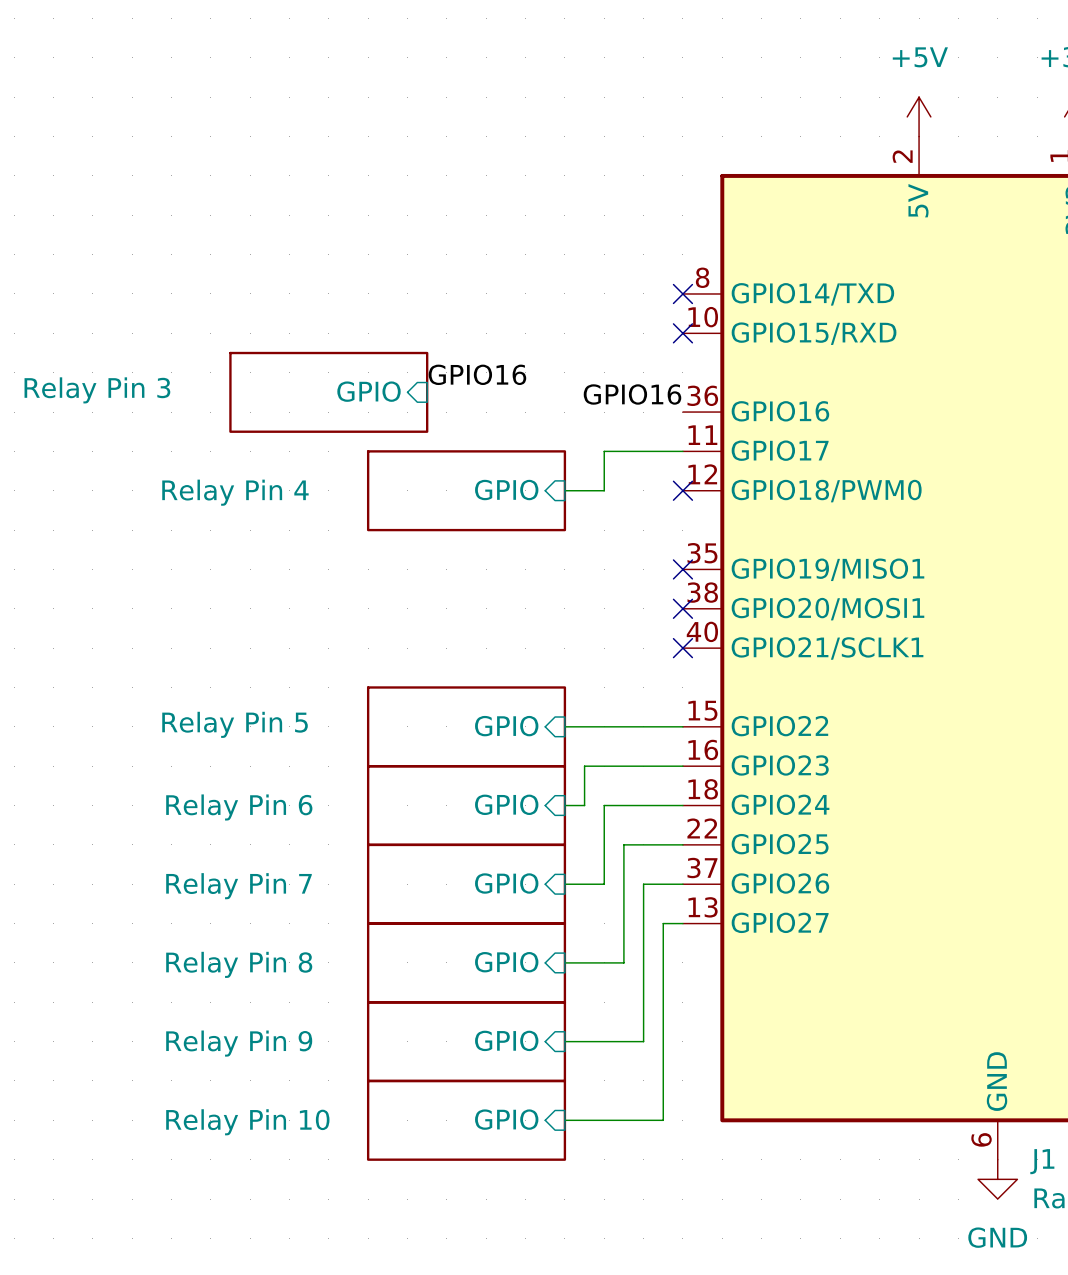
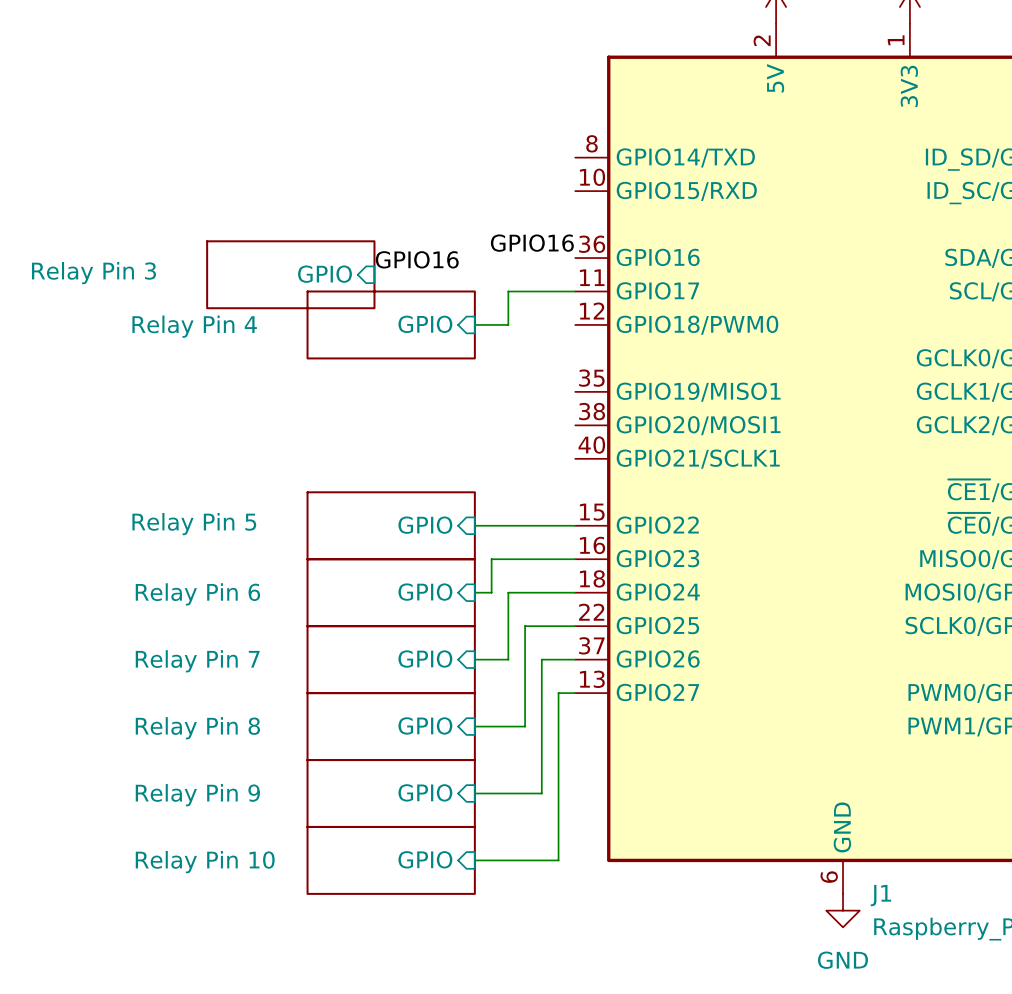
no-connect mark: (682, 293) -> none
no-connect mark: (682, 333) -> none
label position: GPIO16 (477, 374) -> GPIO16 (417, 259)
sheet pin position: GPIO (369, 391) -> GPIO (324, 274)
sheet Relay Pin 3 position: (328, 392) -> (290, 274)
no-connect mark: (682, 490) -> none
no-connect mark: (682, 569) -> none
no-connect mark: (682, 608) -> none
no-connect mark: (682, 648) -> none

